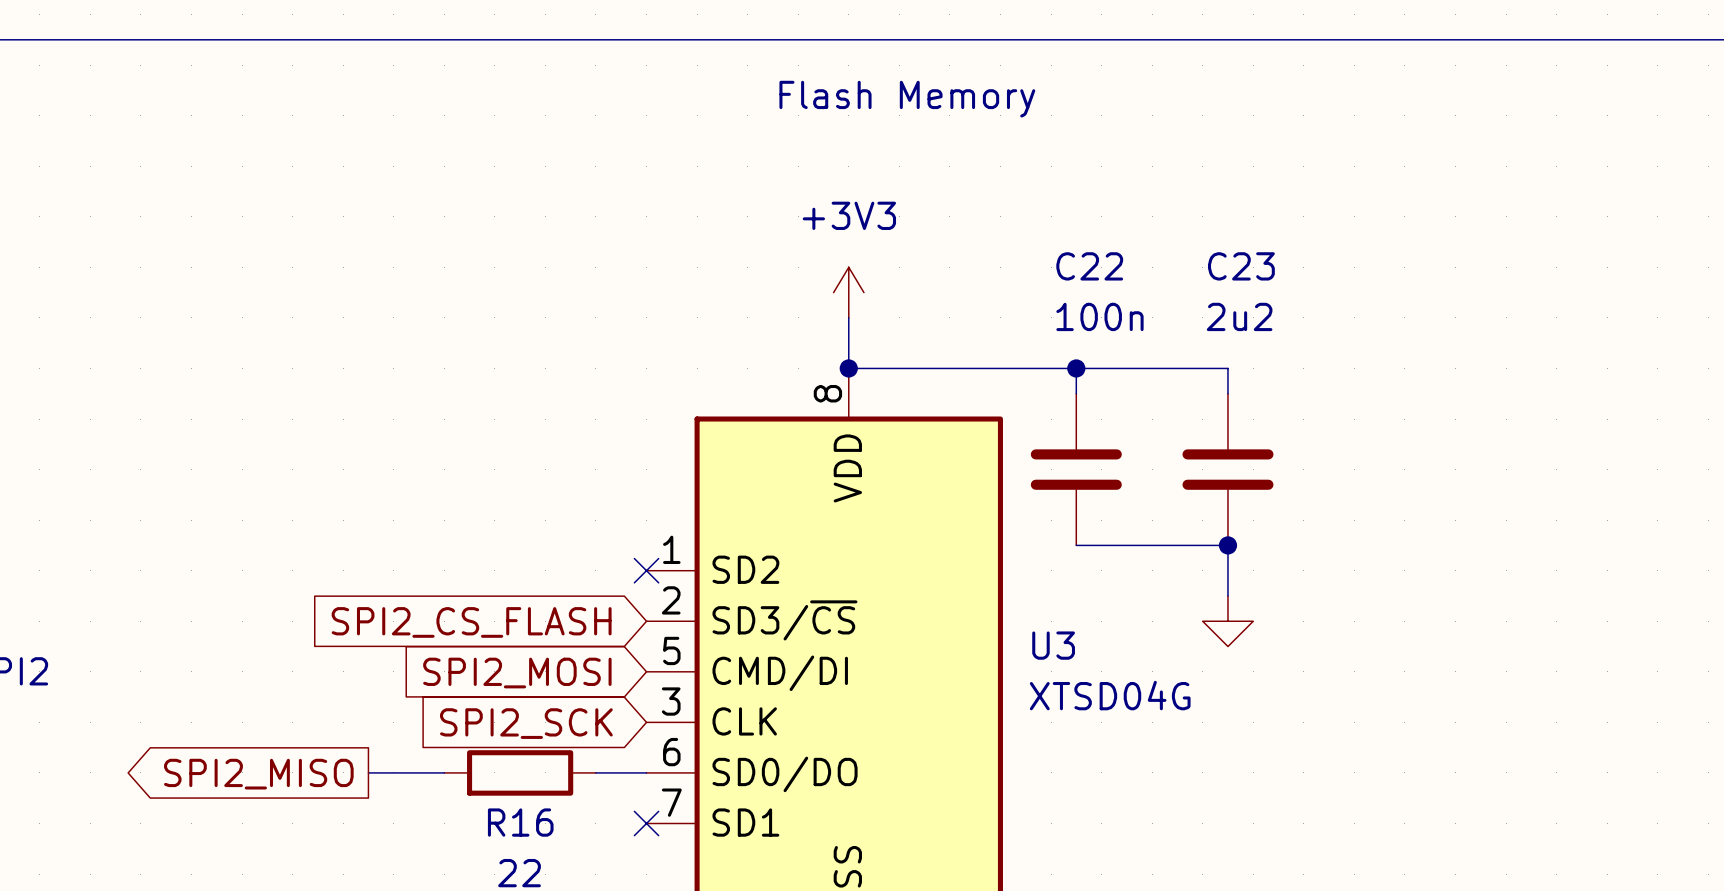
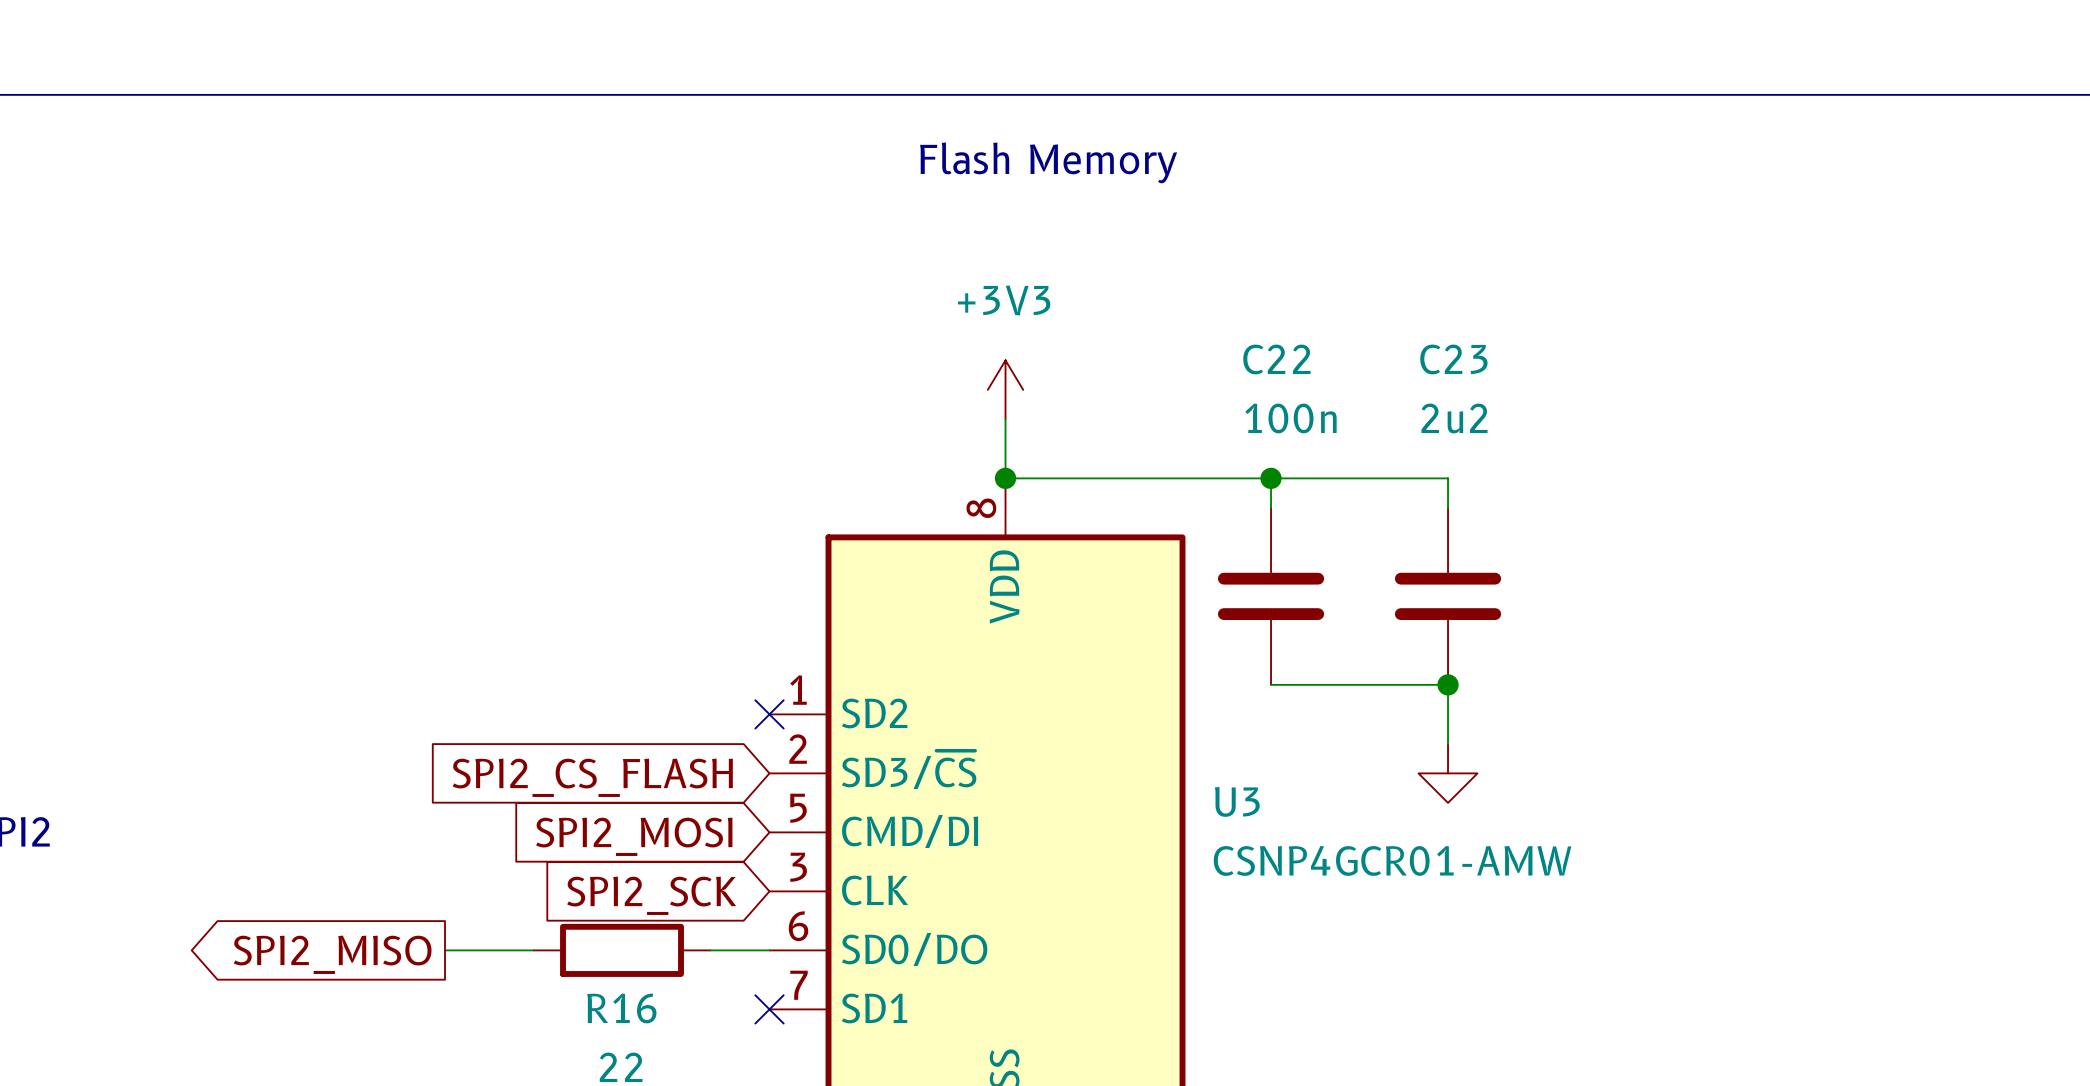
U3 value: XTSD04G (1110, 695) -> CSNP4GCR01-AMW (1392, 860)

